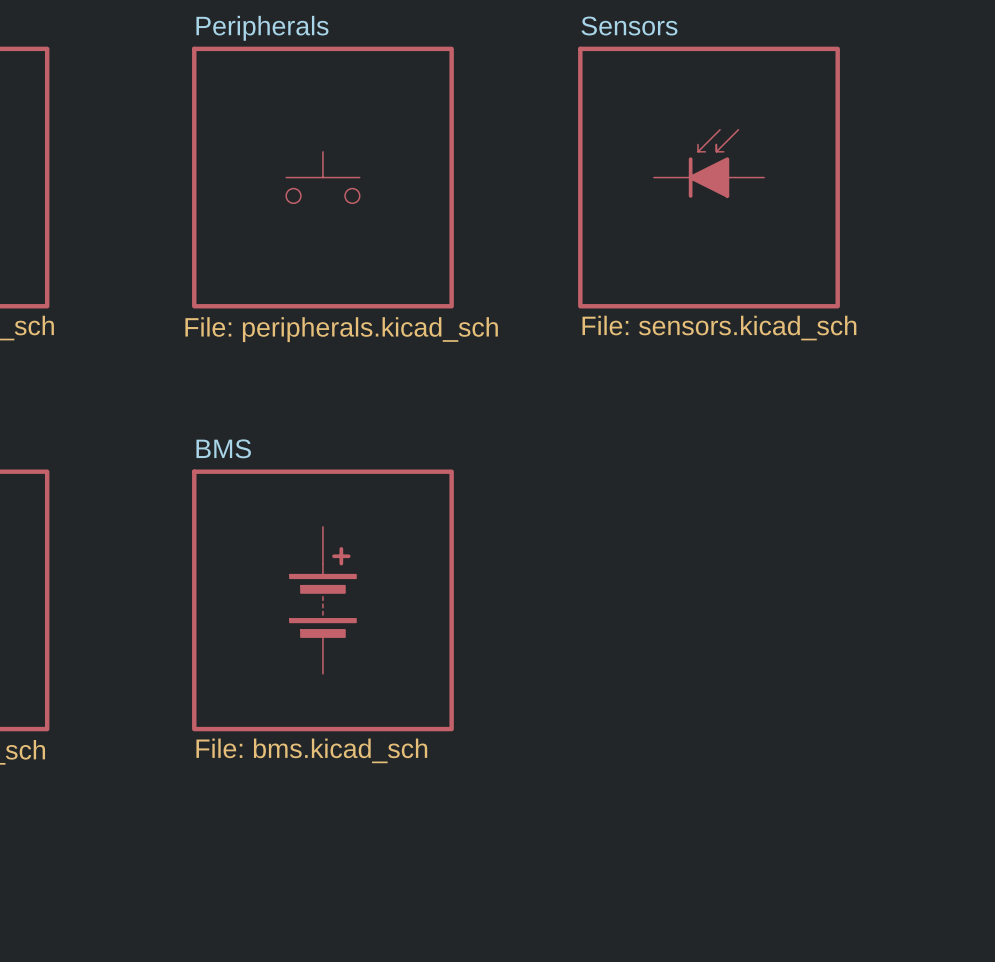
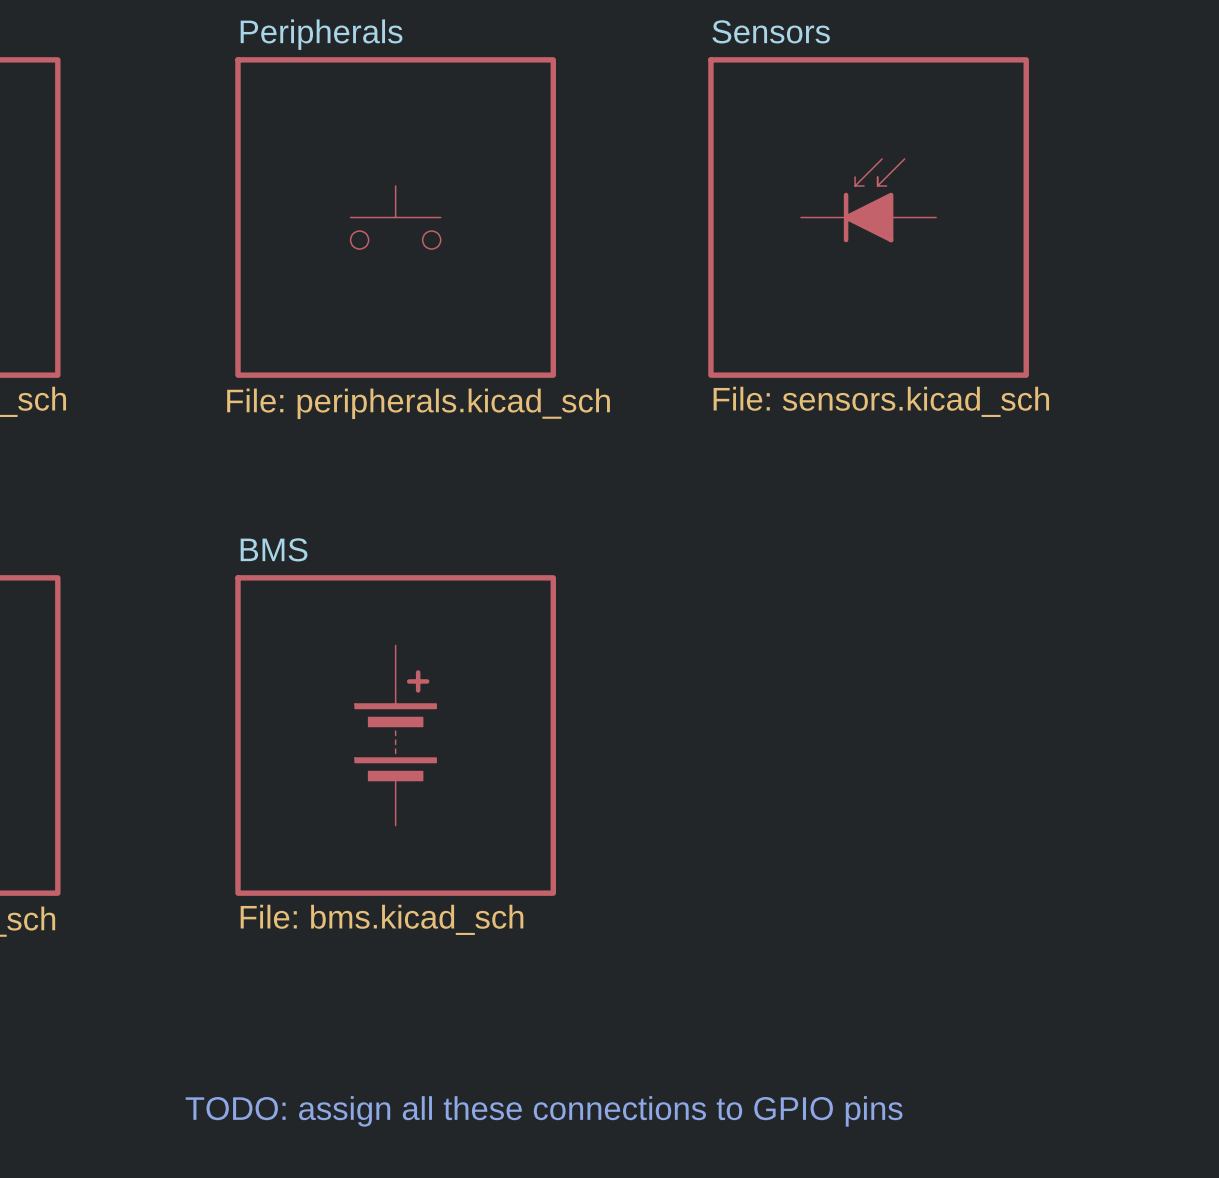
text: none -> TODO: assign all these connections to GPIO pins (544, 1111)

